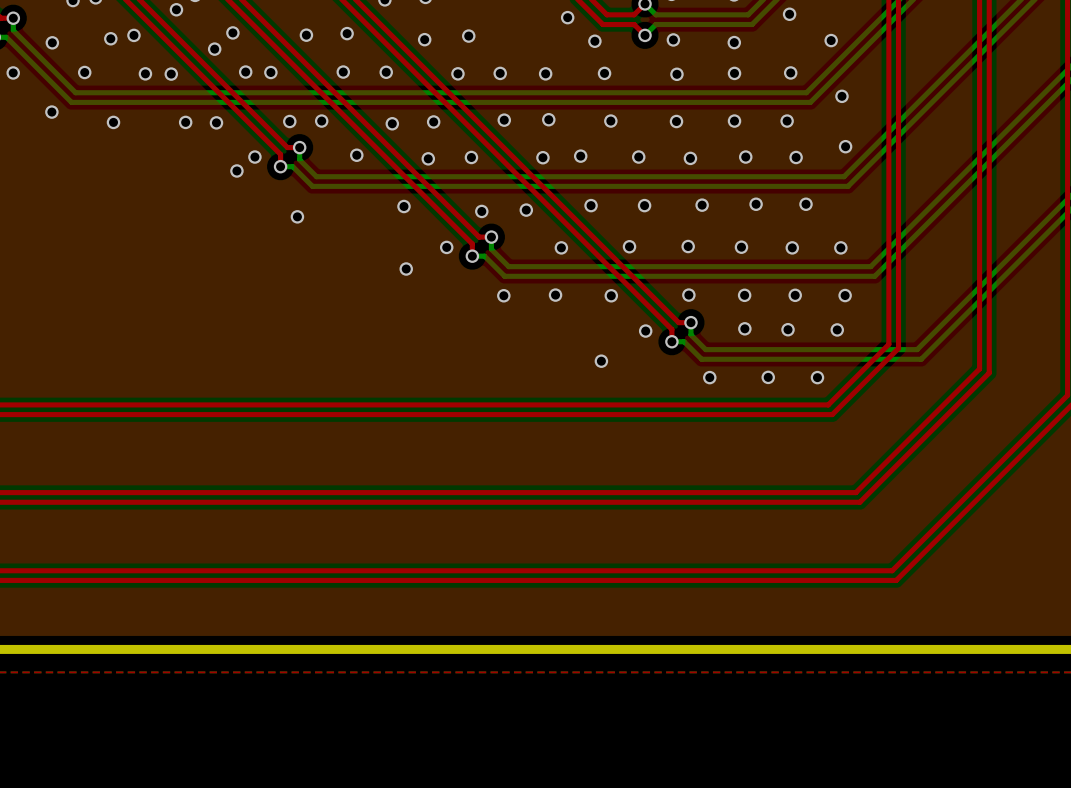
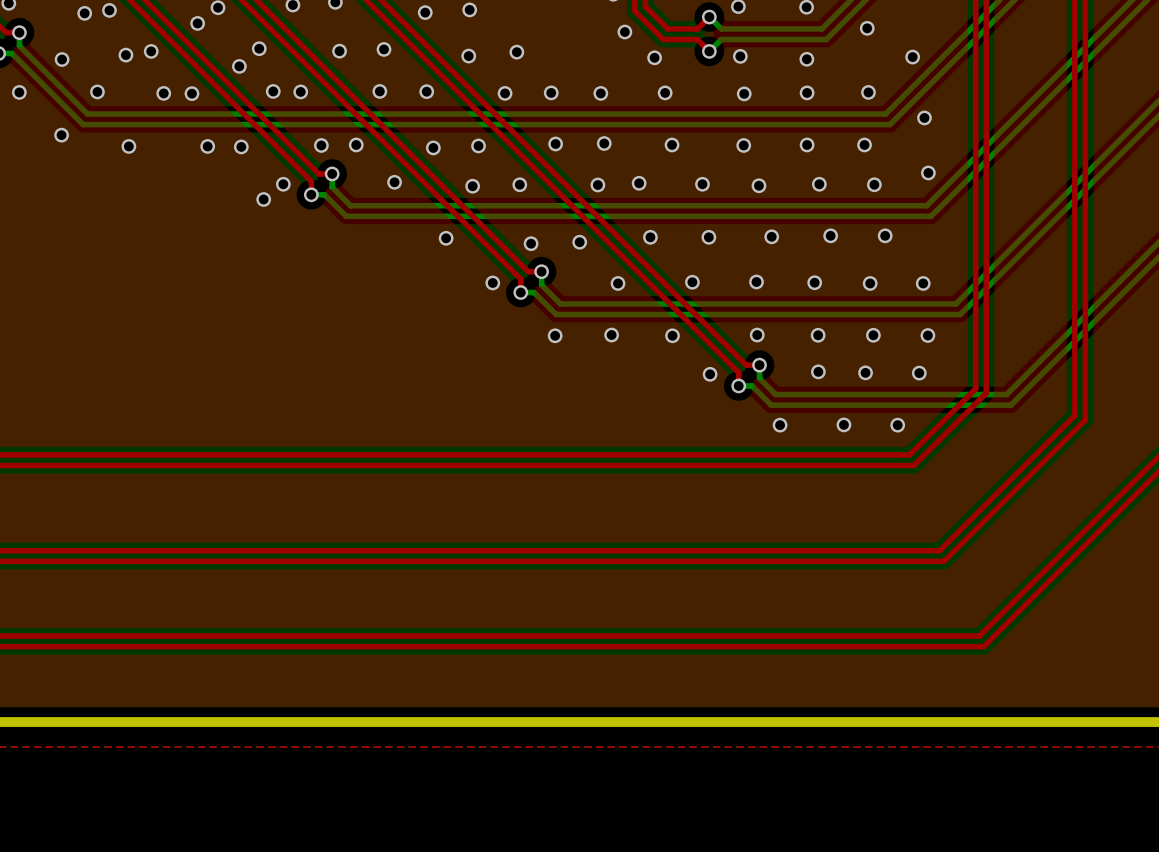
via: (297, 216) -> none
via: (406, 269) -> none
via: (601, 361) -> none

